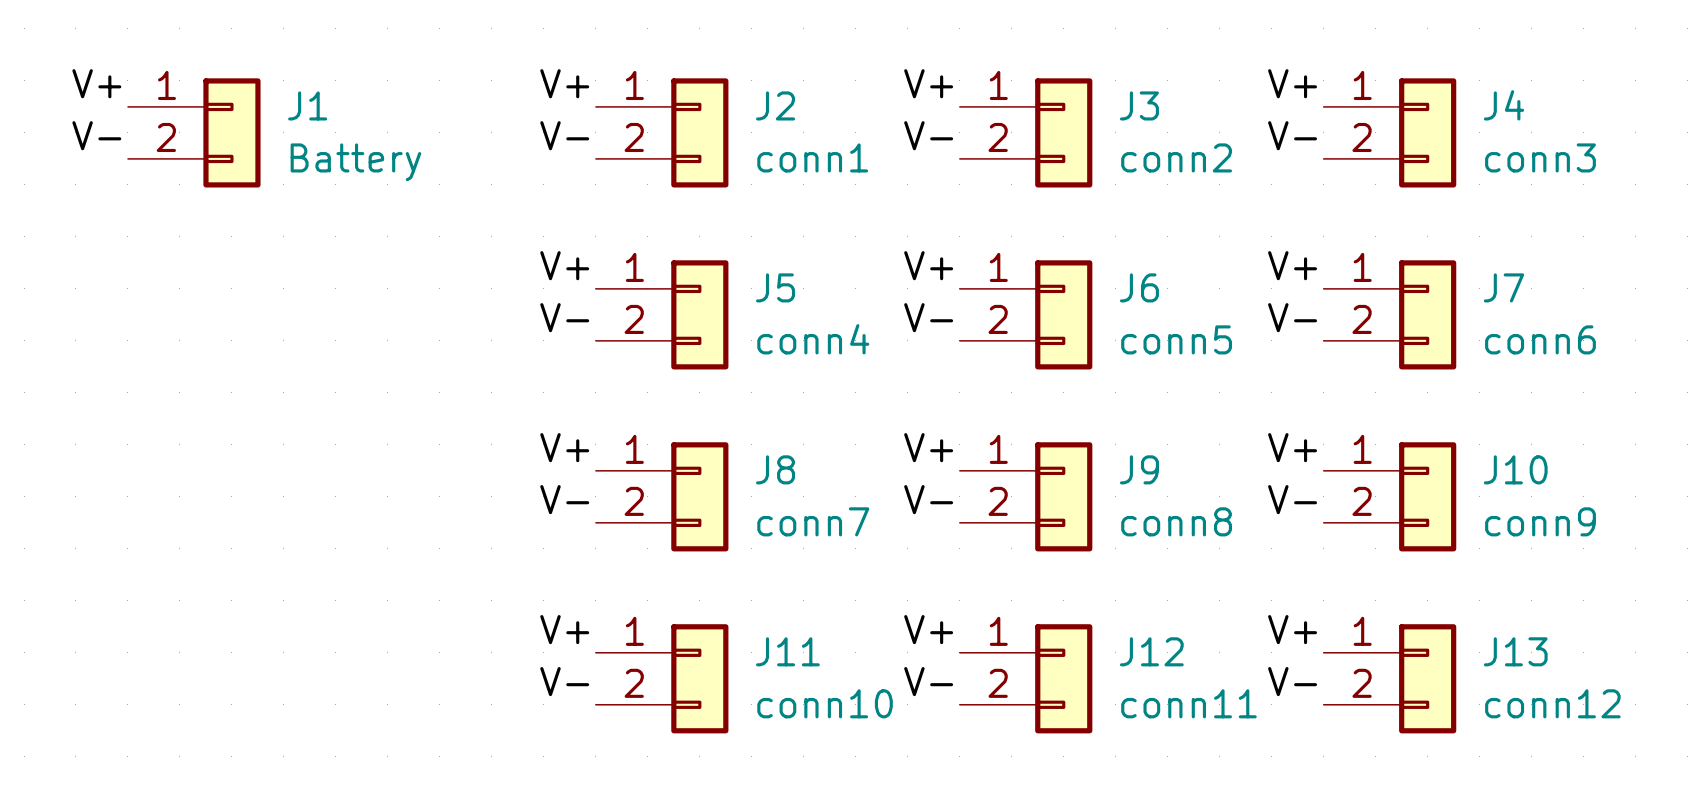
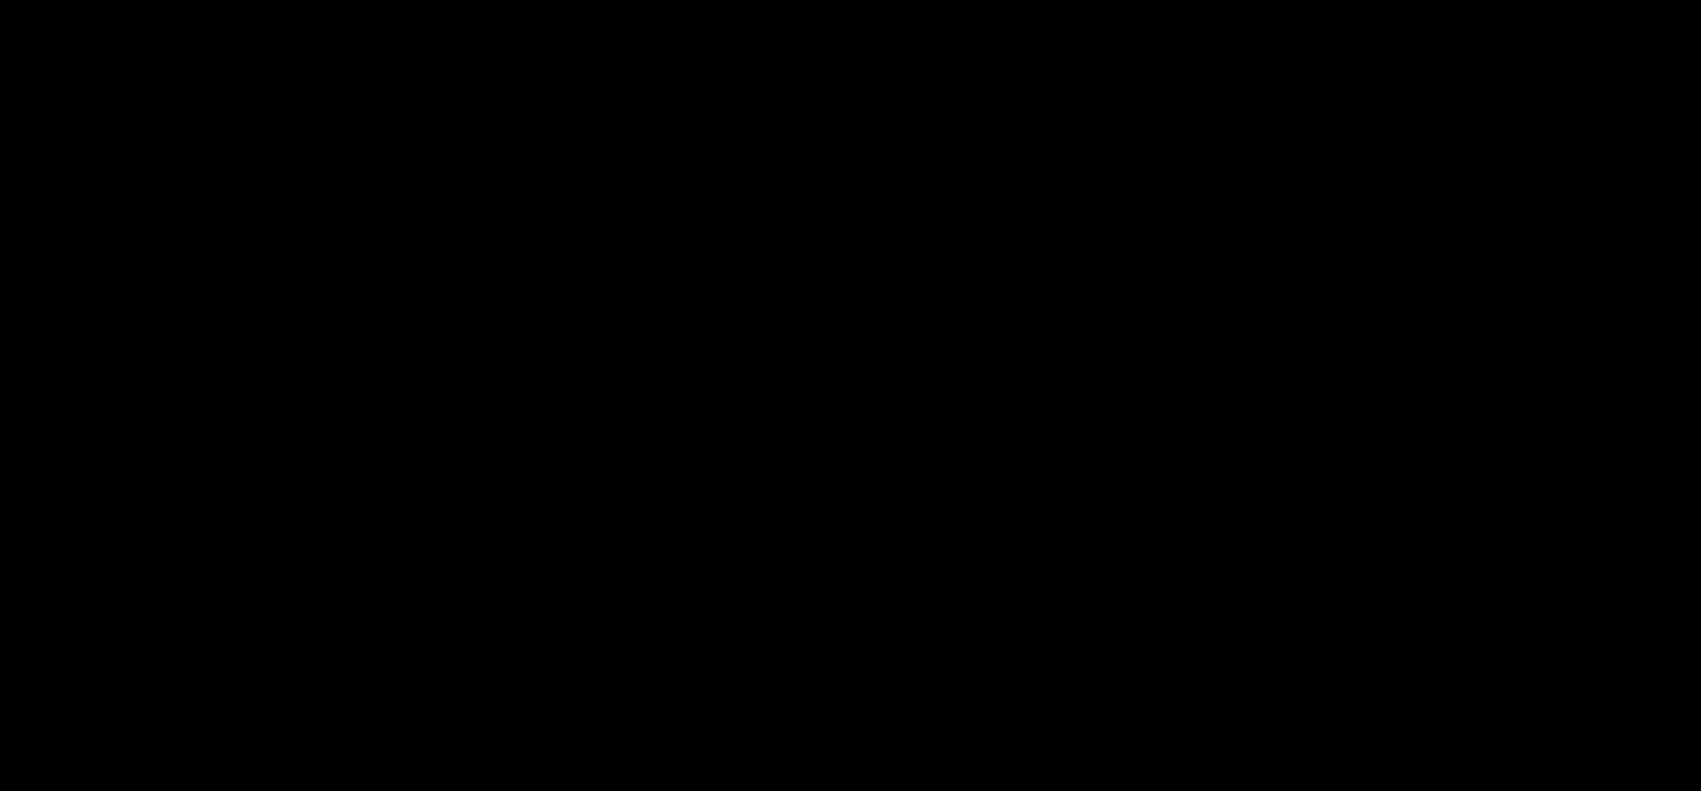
label: V+ (96, 83) -> none
label: V+ (564, 83) -> none
label: V+ (928, 83) -> none
label: V+ (1292, 83) -> none
J1: Battery (194, 132) -> none
J2: conn1 (662, 132) -> none
J3: conn2 (1026, 132) -> none
J4: conn3 (1389, 132) -> none
label: V- (96, 135) -> none
label: V- (564, 135) -> none
label: V- (928, 135) -> none
label: V- (1292, 135) -> none
label: V+ (564, 265) -> none
label: V+ (928, 265) -> none
label: V+ (1292, 265) -> none
J5: conn4 (662, 314) -> none
J6: conn5 (1026, 314) -> none
J7: conn6 (1389, 314) -> none
label: V- (564, 317) -> none
label: V- (928, 317) -> none
label: V- (1292, 317) -> none
label: V+ (564, 447) -> none
label: V+ (928, 447) -> none
label: V+ (1292, 447) -> none
J8: conn7 (662, 496) -> none
J9: conn8 (1026, 496) -> none
J10: conn9 (1389, 496) -> none
label: V- (564, 499) -> none
label: V- (928, 499) -> none
label: V- (1292, 499) -> none
label: V+ (564, 629) -> none
label: V+ (928, 629) -> none
label: V+ (1292, 629) -> none
J11: conn10 (662, 678) -> none
J12: conn11 (1026, 678) -> none
J13: conn12 (1389, 678) -> none
label: V- (564, 681) -> none
label: V- (928, 681) -> none
label: V- (1292, 681) -> none

